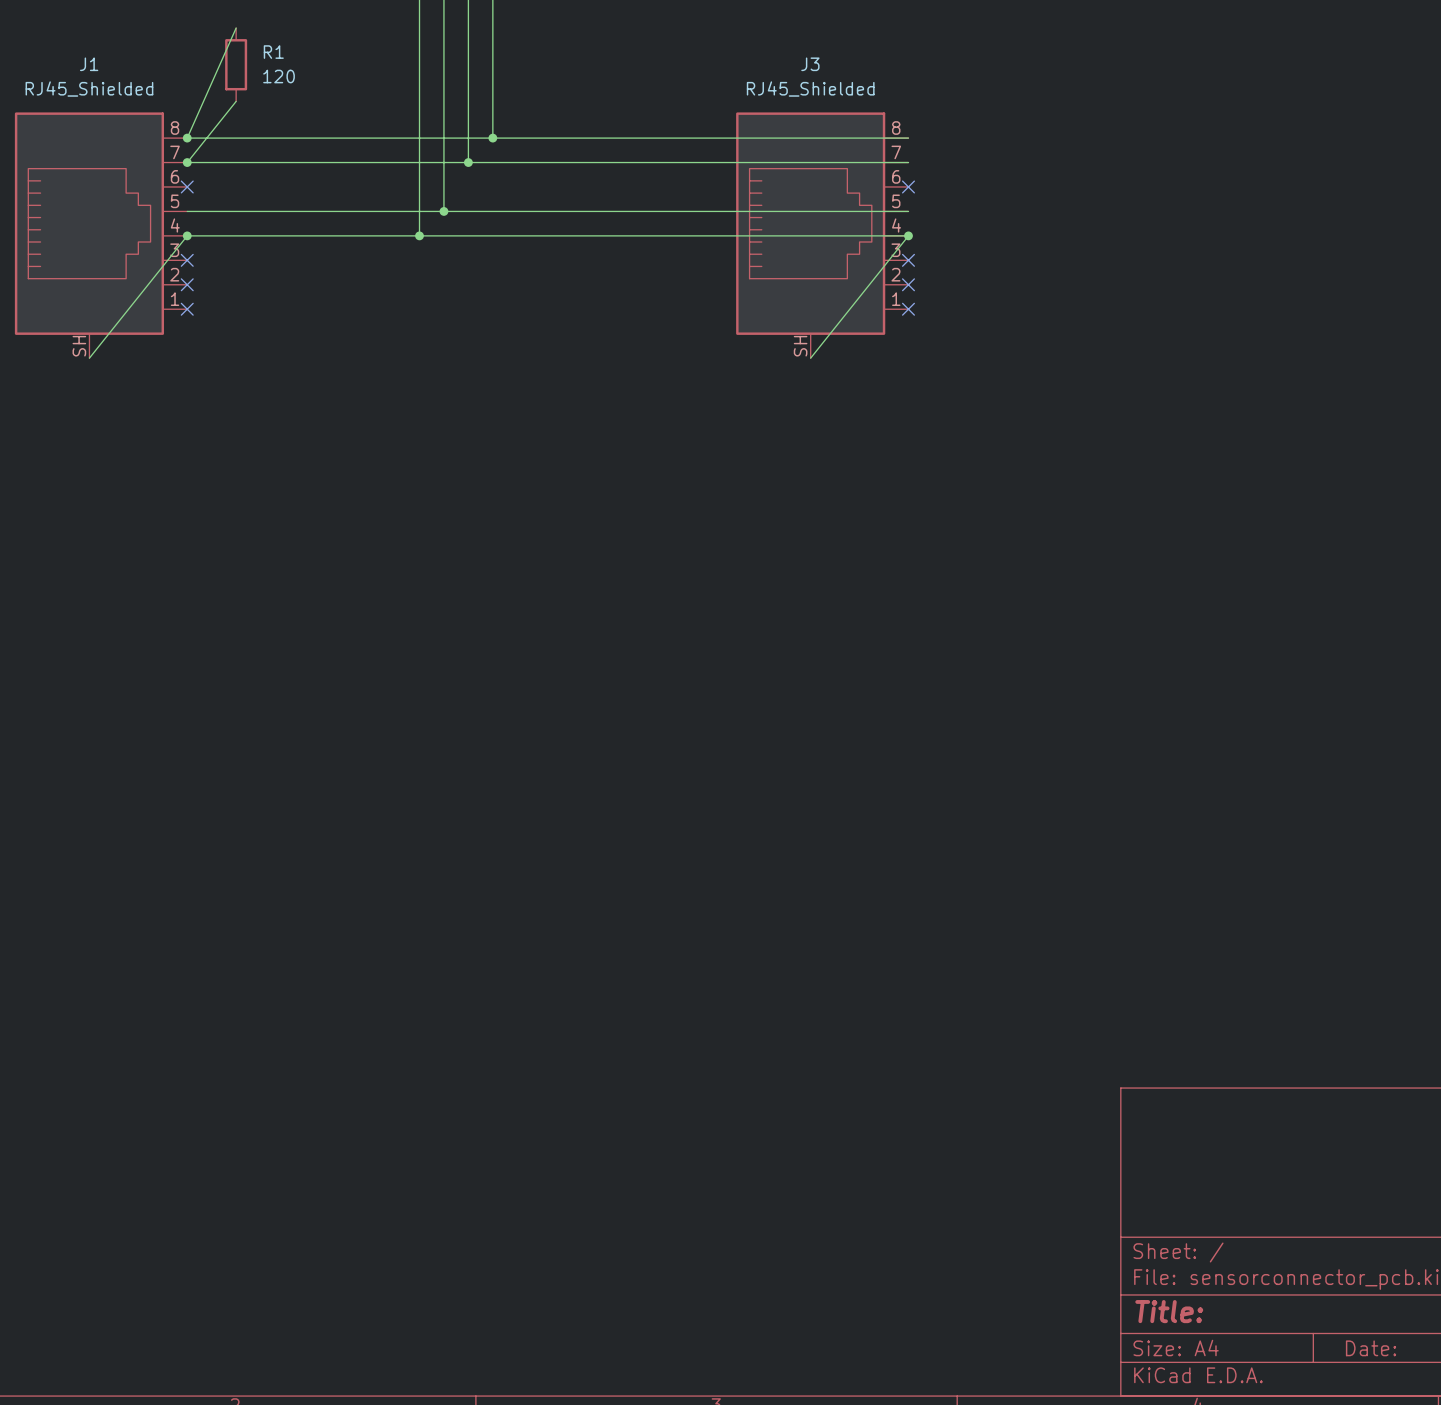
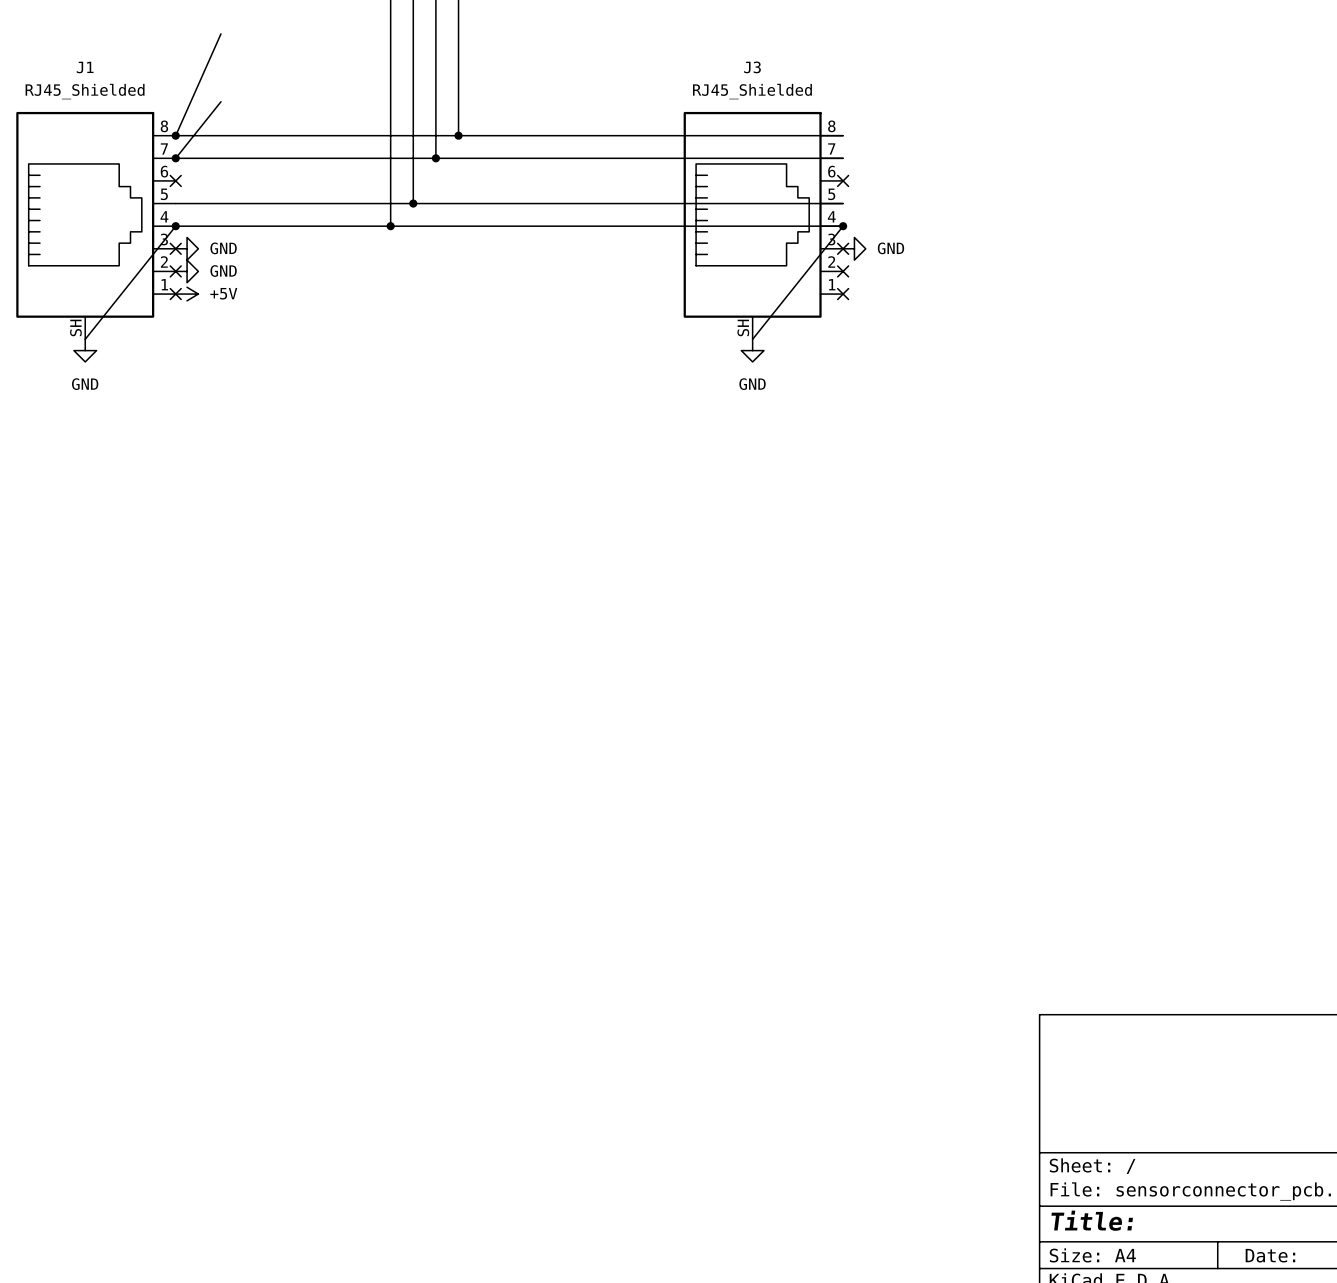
R1: 120 (236, 64) -> none
power symbol: none -> GND (187, 248)
power symbol: none -> GND (854, 248)
power symbol: none -> GND (187, 271)
power symbol: none -> +5V (187, 294)
power symbol: none -> GND (85, 350)
power symbol: none -> GND (752, 350)

